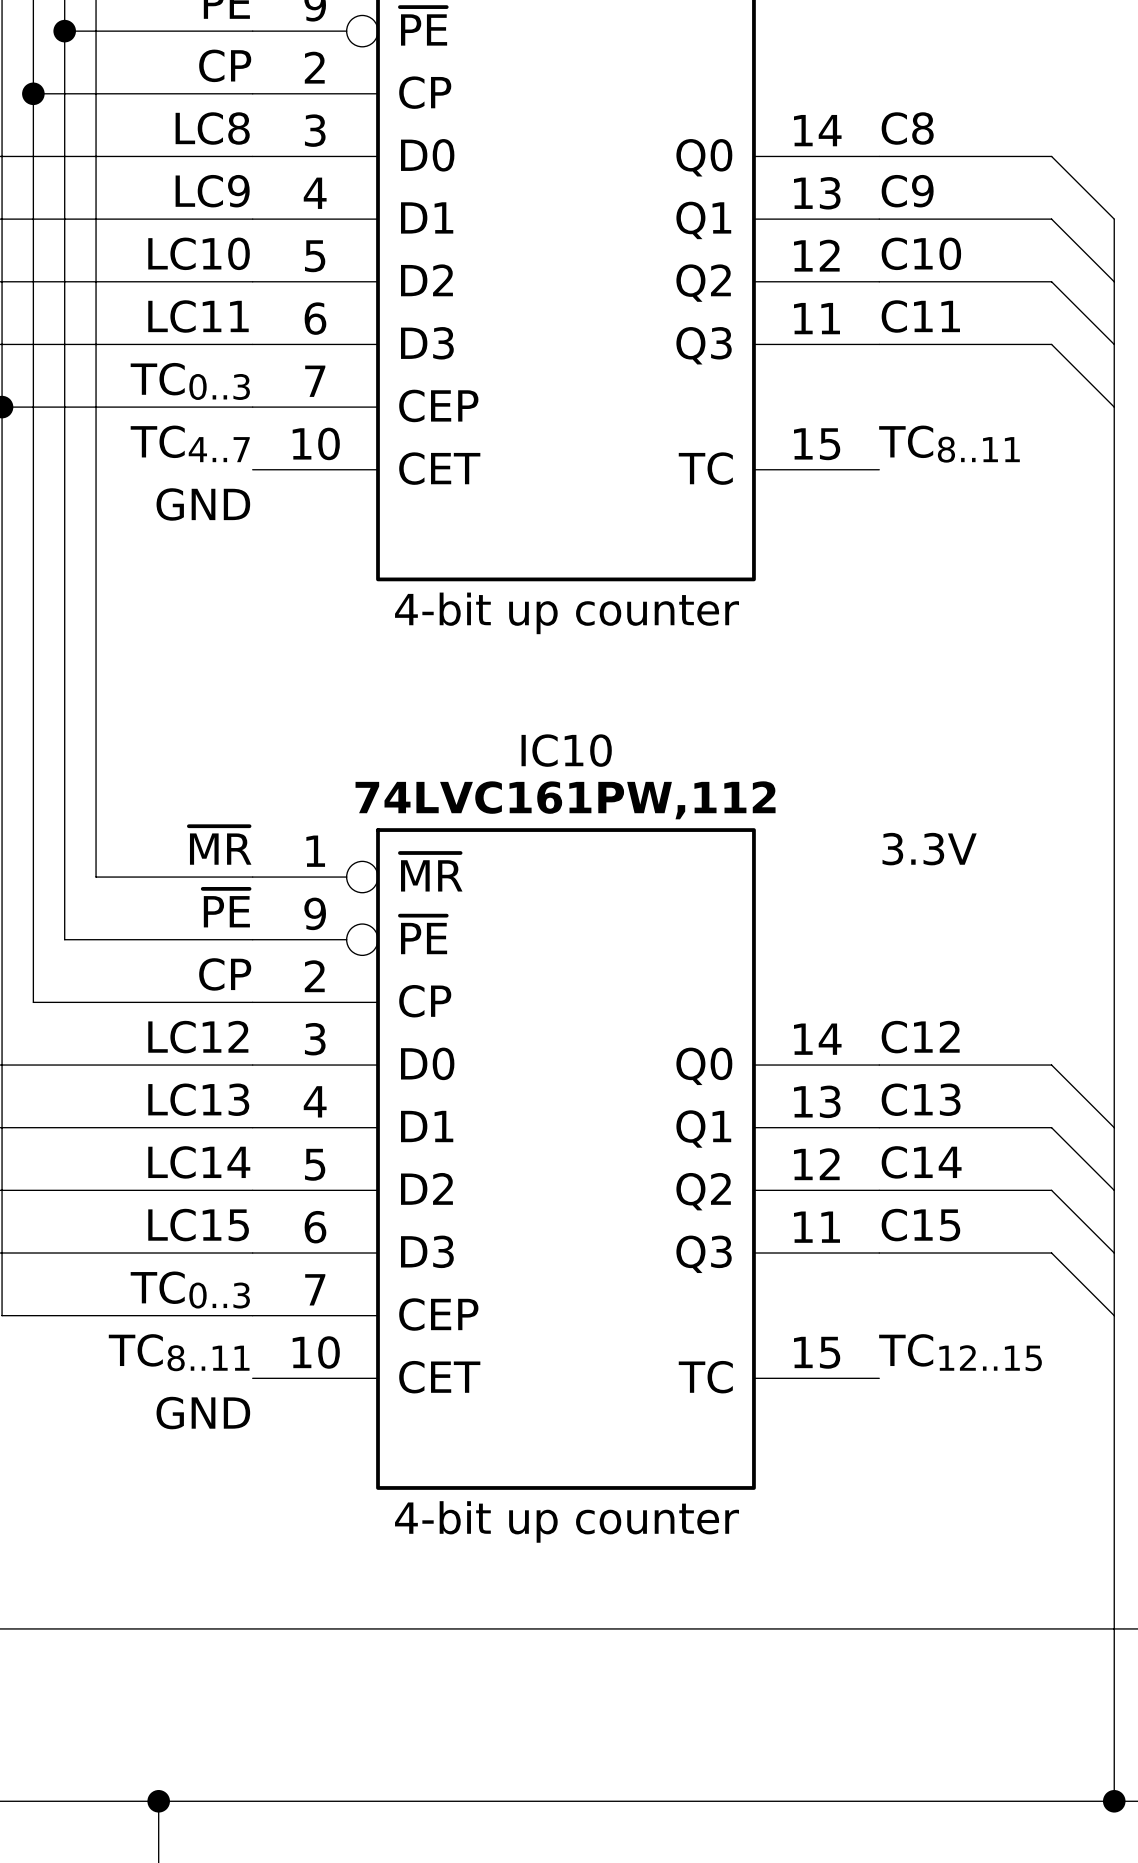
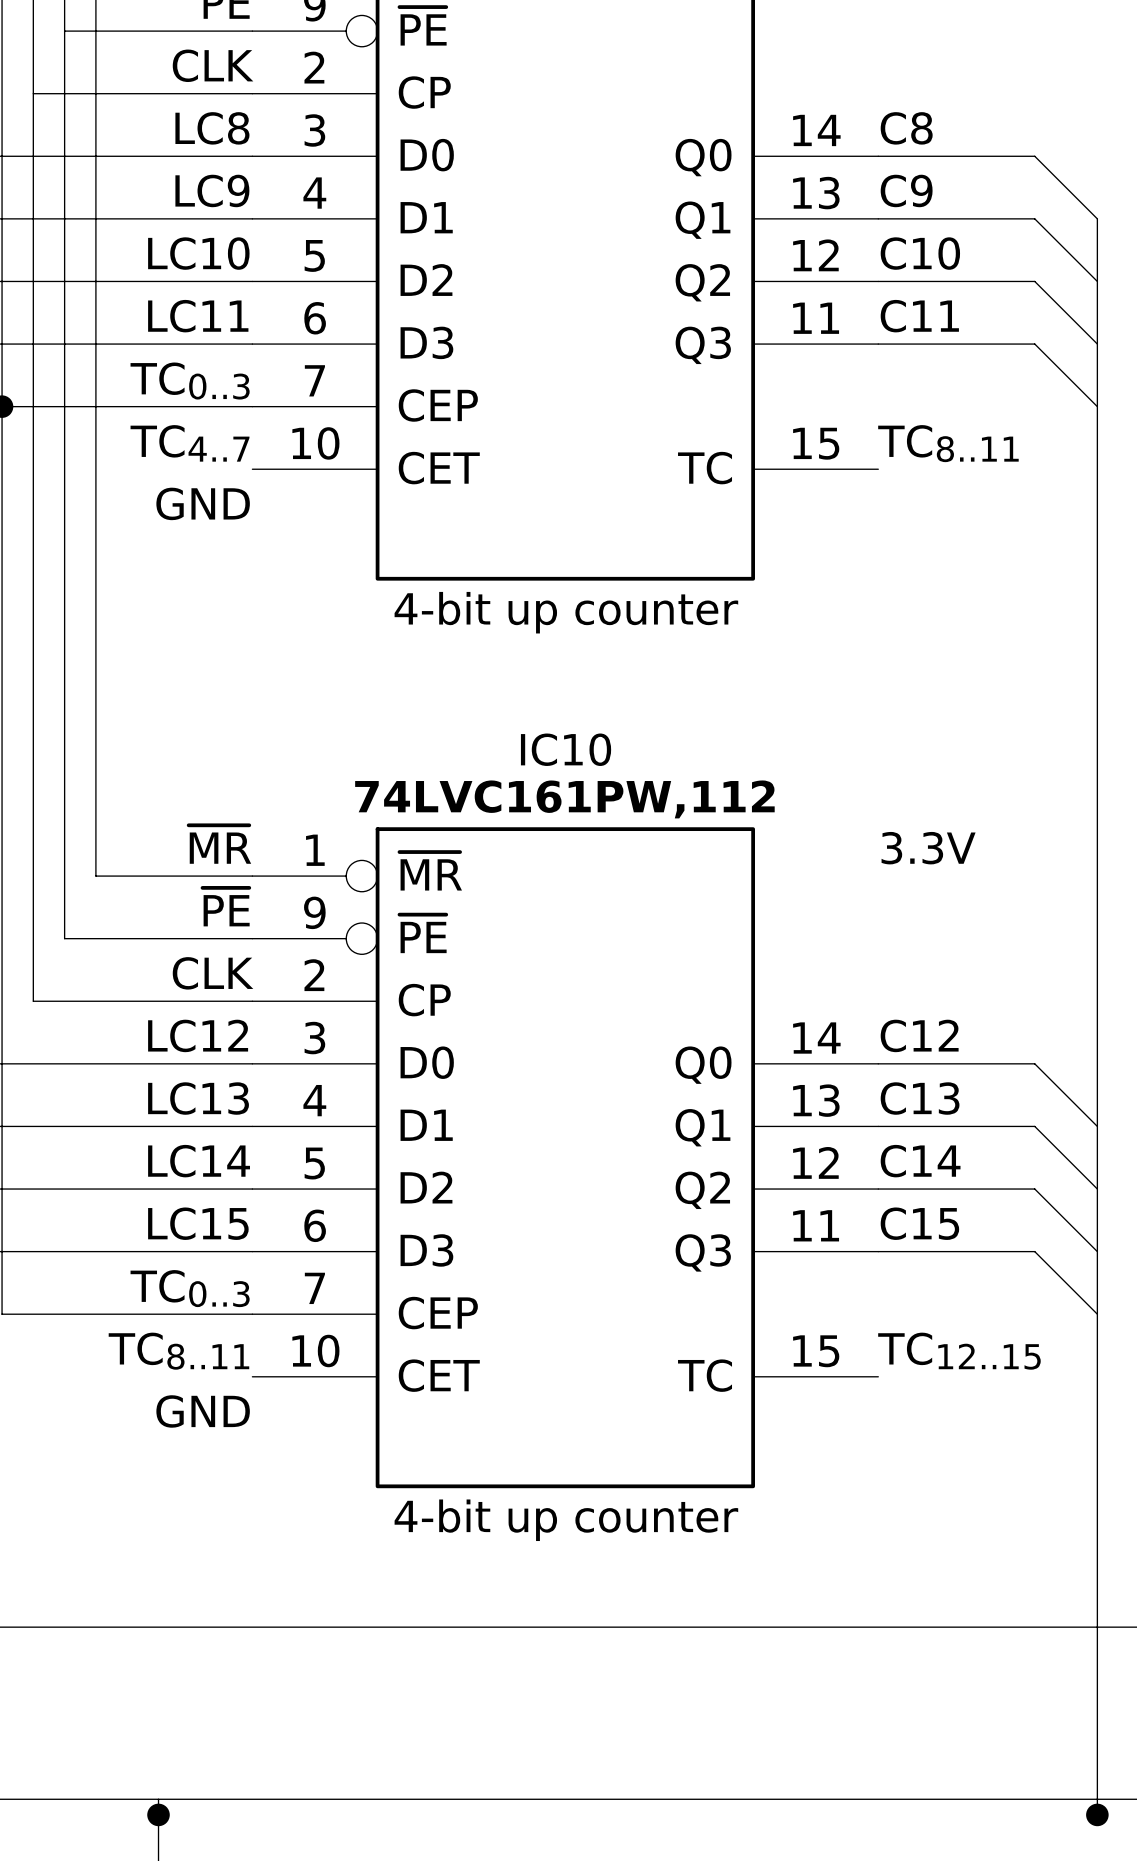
junction: (64, 31) -> none
label: CP (225, 65) -> CLK (213, 65)
junction: (33, 93) -> none
wire: (1035, 156) (1051, 156) (1114, 219) -> (1034, 156) (1097, 218)
wire: (1035, 219) (1051, 219) (1114, 281) -> (1034, 218) (1097, 281)
bus: none -> (1097, 218) (1097, 1814)
bus: (1114, 219) (1114, 1801) -> none
wire: (1035, 281) (1051, 281) (1114, 344) -> (1034, 281) (1097, 344)
wire: (1035, 344) (1051, 344) (1114, 407) -> (1034, 344) (1097, 406)
label: CP (225, 974) -> CLK (213, 973)
wire: (1035, 1065) (1051, 1065) (1114, 1127) -> (1034, 1063) (1097, 1126)
wire: (1035, 1127) (1051, 1127) (1114, 1190) -> (1034, 1126) (1097, 1189)
wire: (1035, 1190) (1051, 1190) (1114, 1253) -> (1034, 1189) (1097, 1251)
wire: (1035, 1253) (1051, 1253) (1114, 1315) -> (1034, 1251) (1097, 1314)
junction position: (158, 1801) -> (158, 1814)
junction position: (1114, 1801) -> (1097, 1814)

